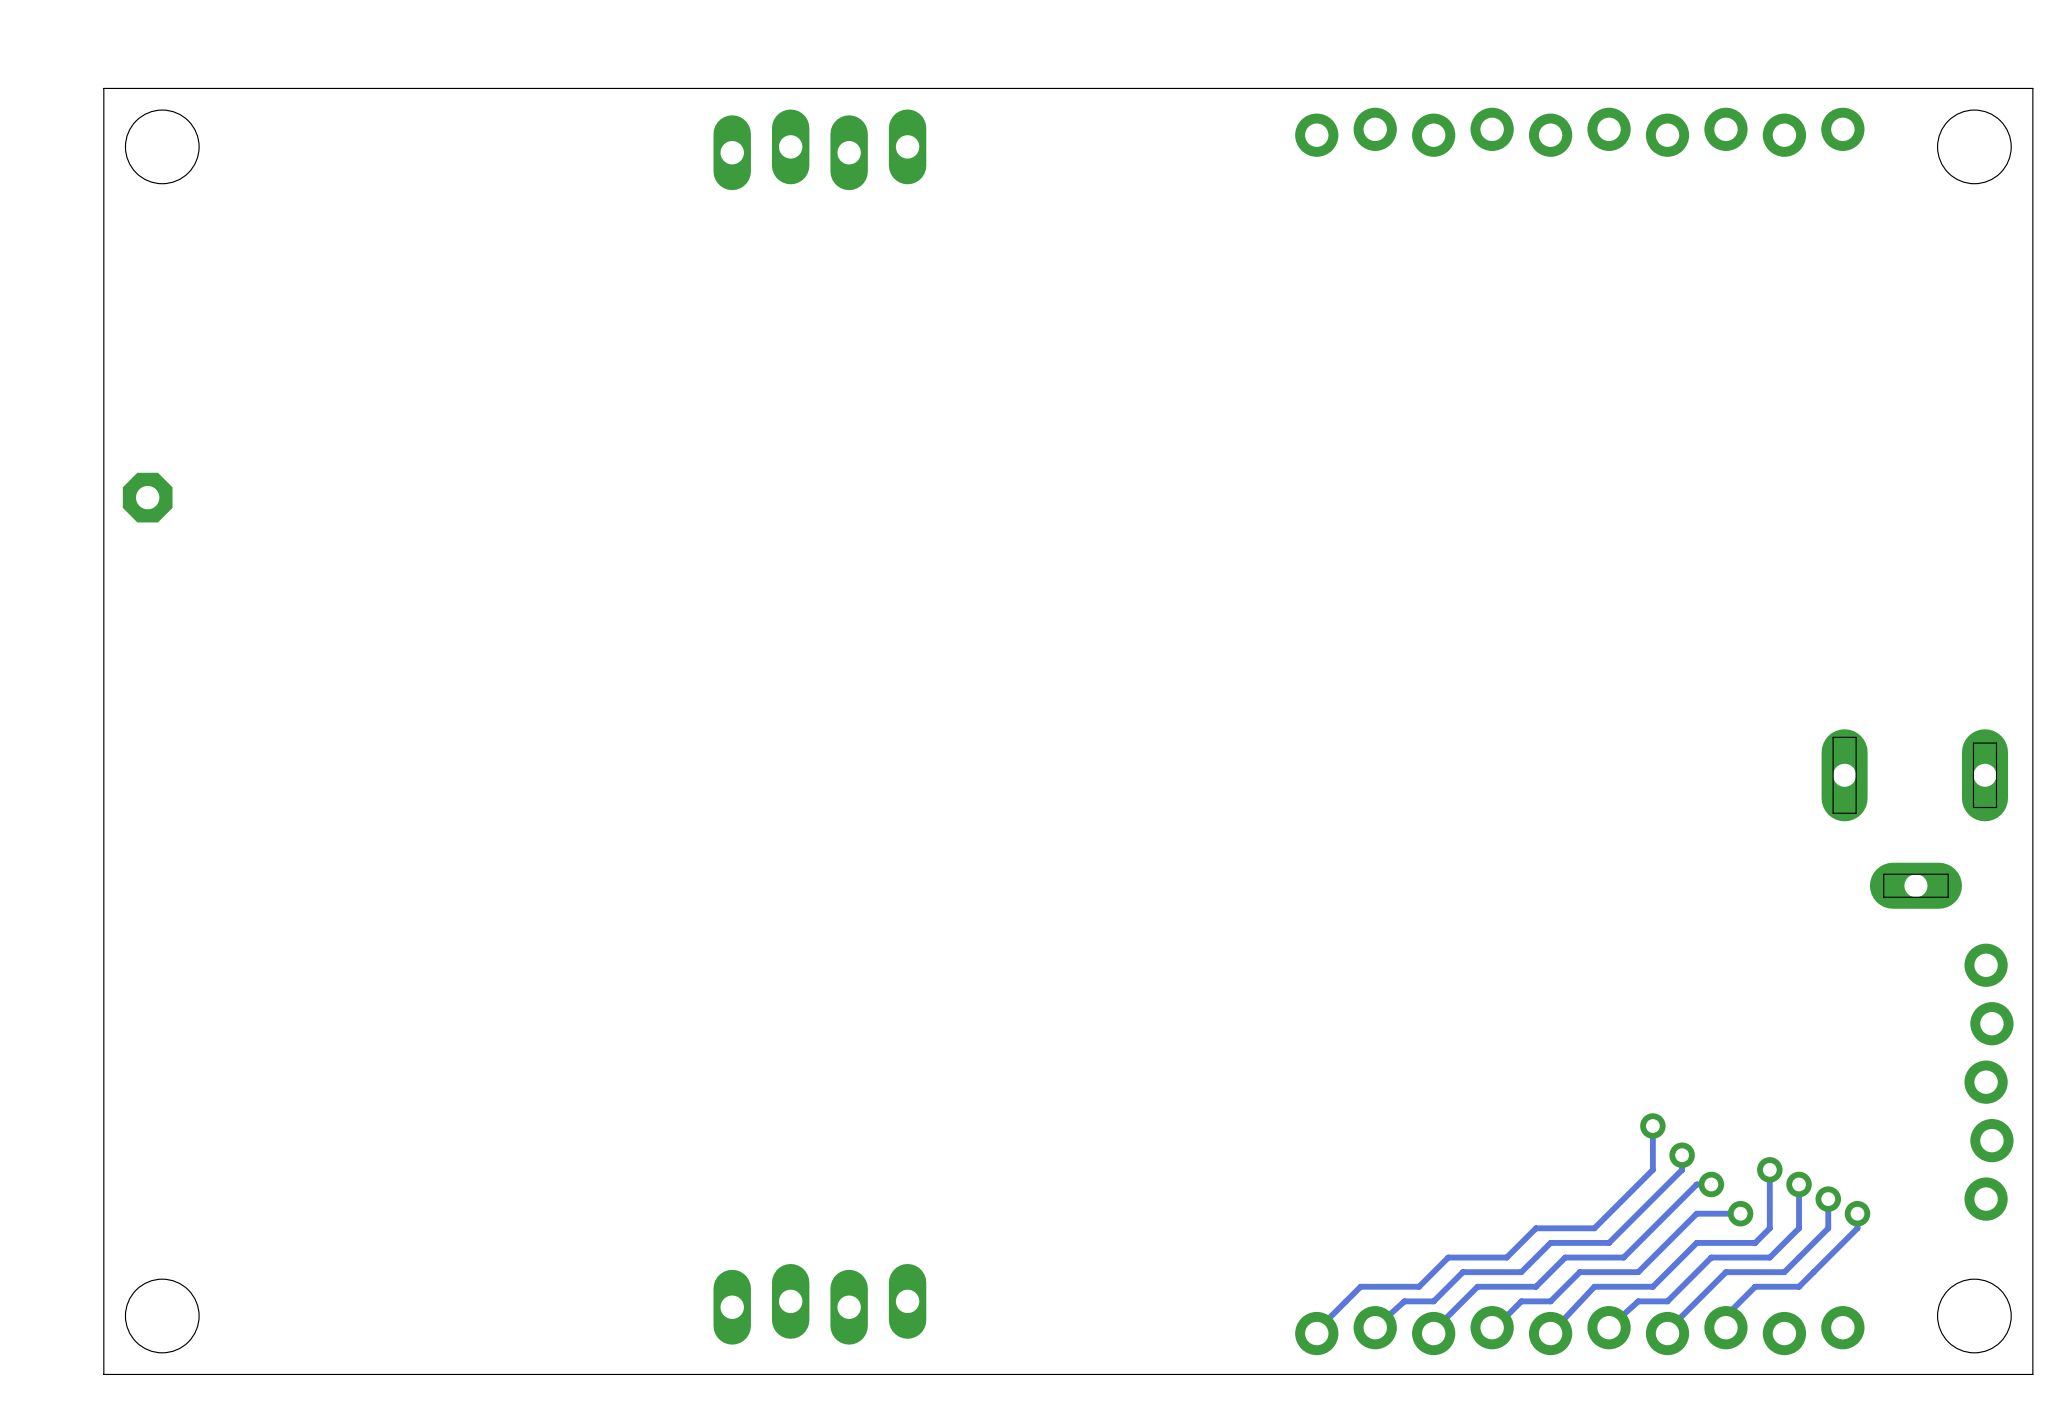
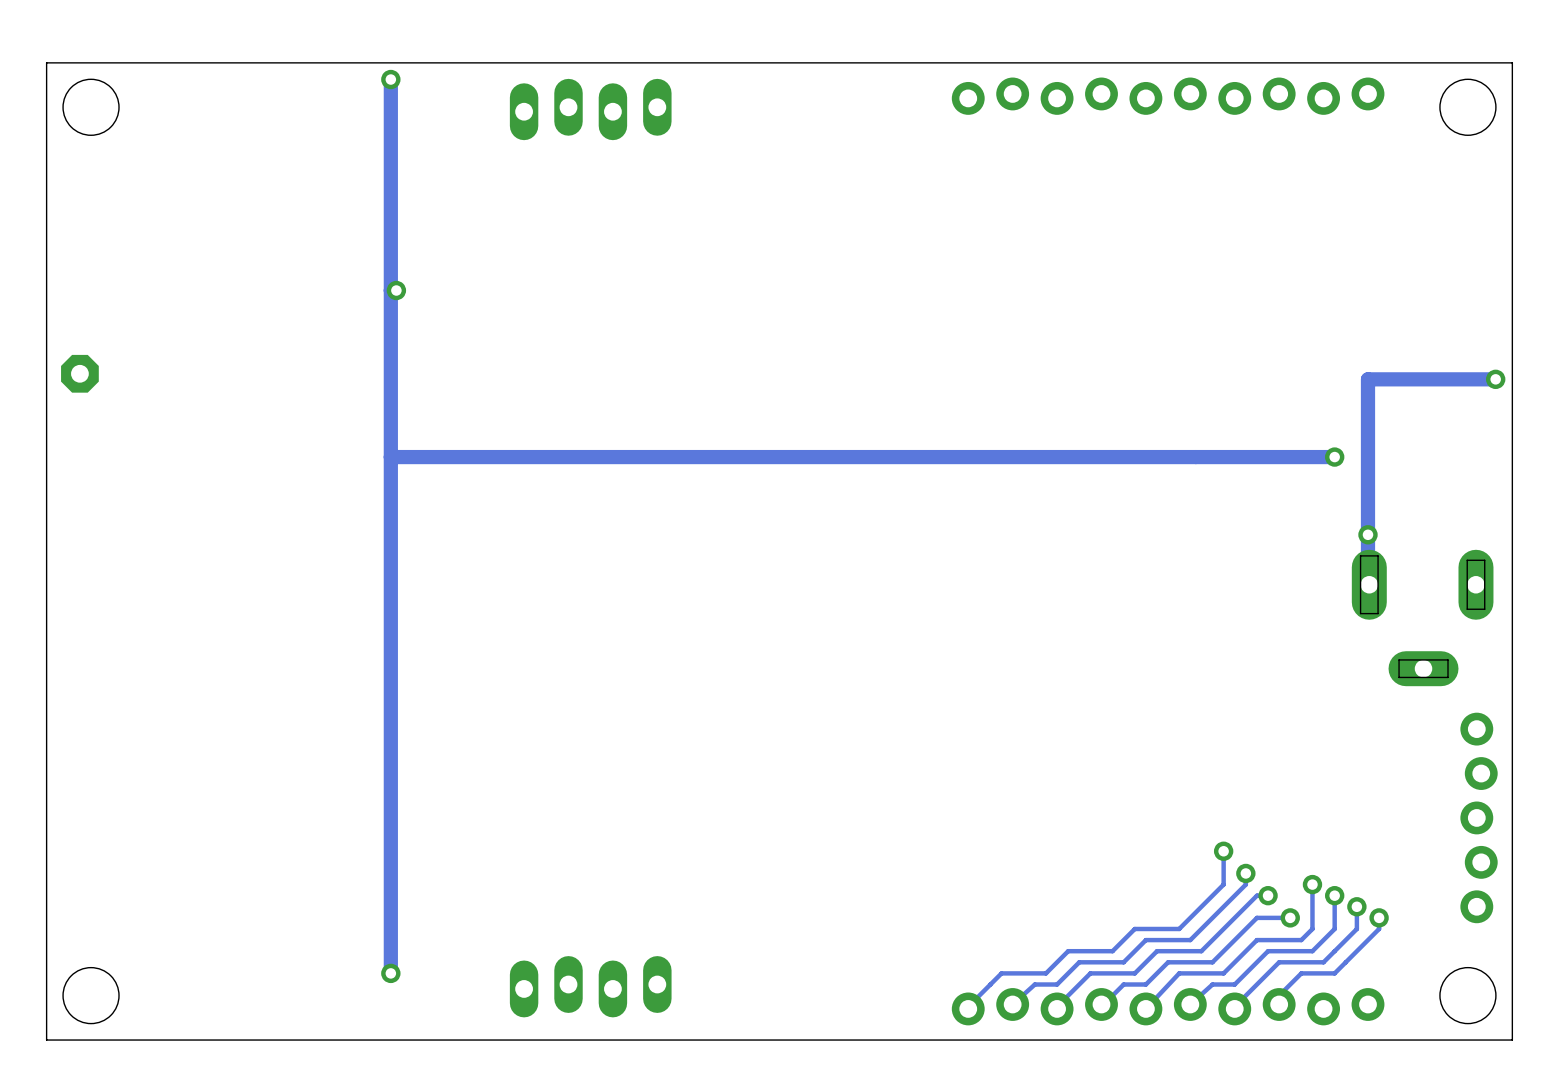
track: none -> (390, 79) (390, 973)
via: none -> (390, 79)
via: none -> (396, 290)
track: none -> (1495, 379) (1367, 379) (1367, 584)
via: none -> (1495, 379)
track: none -> (1334, 457) (390, 457)
via: none -> (1334, 457)
via: none -> (1367, 534)
via: none -> (390, 973)

